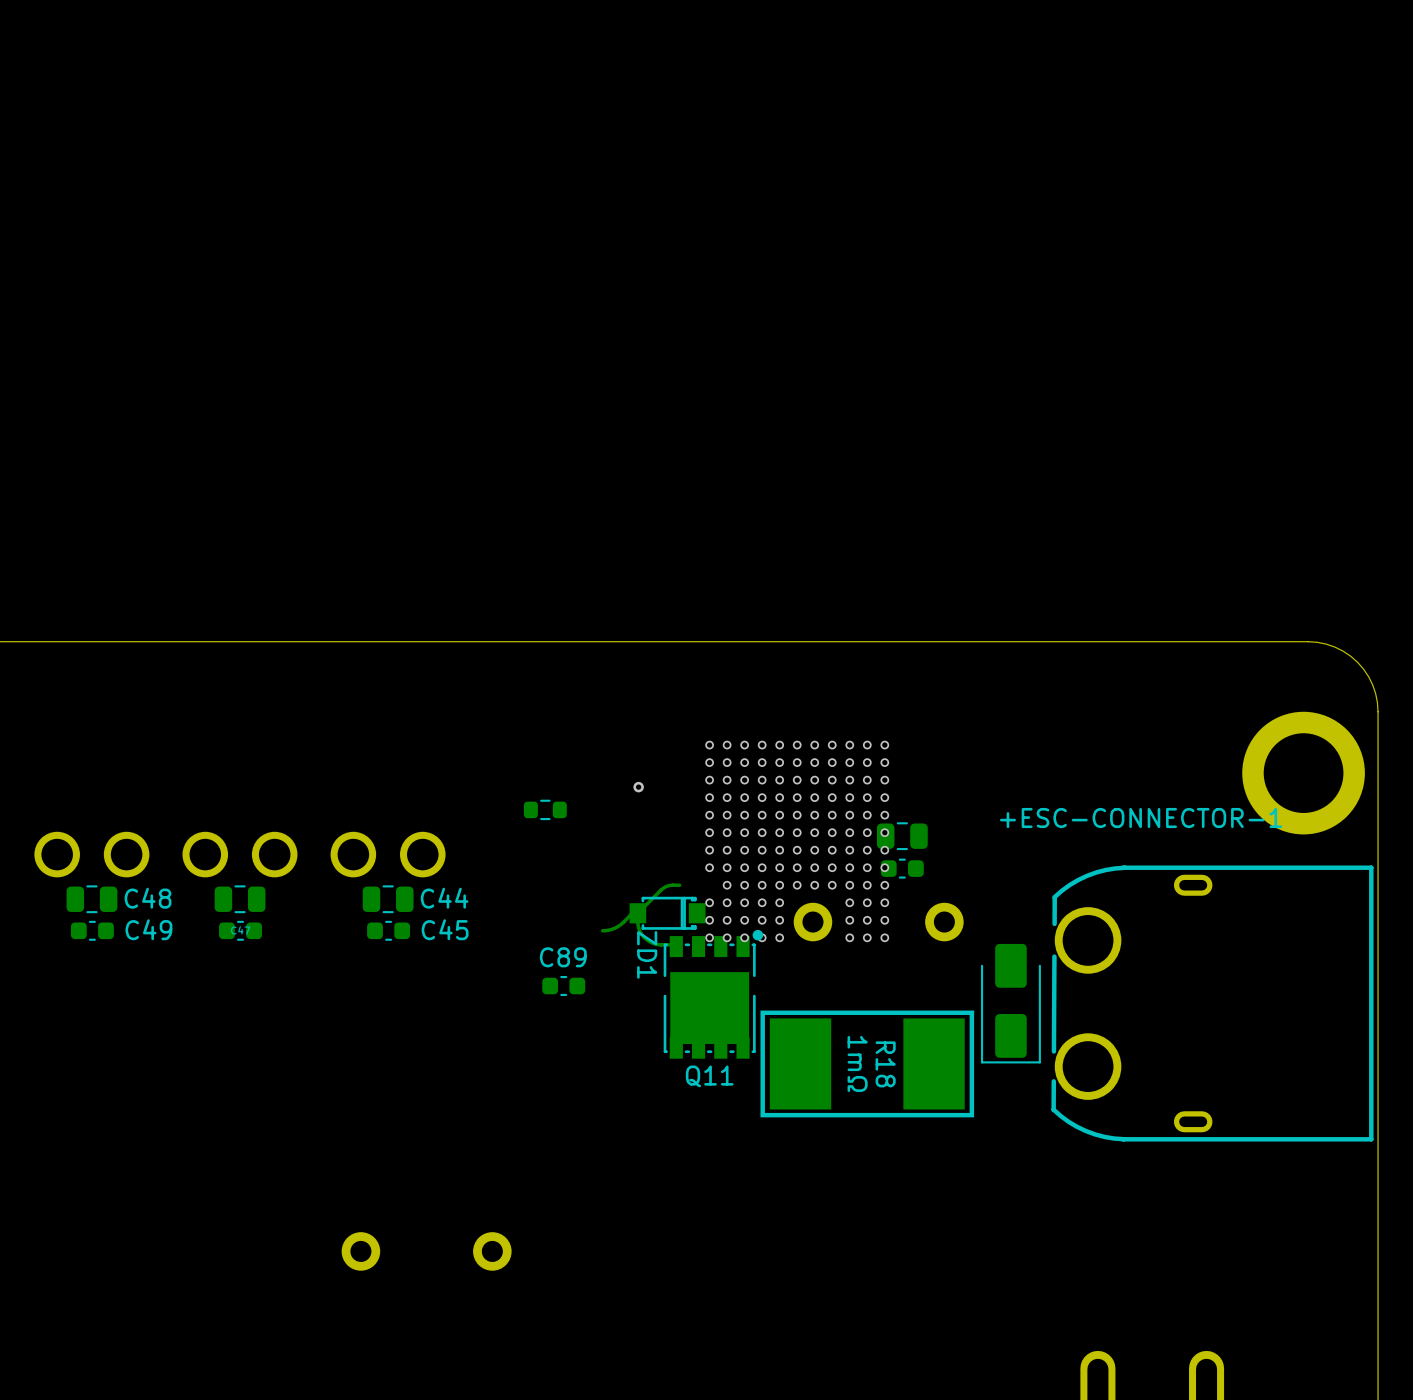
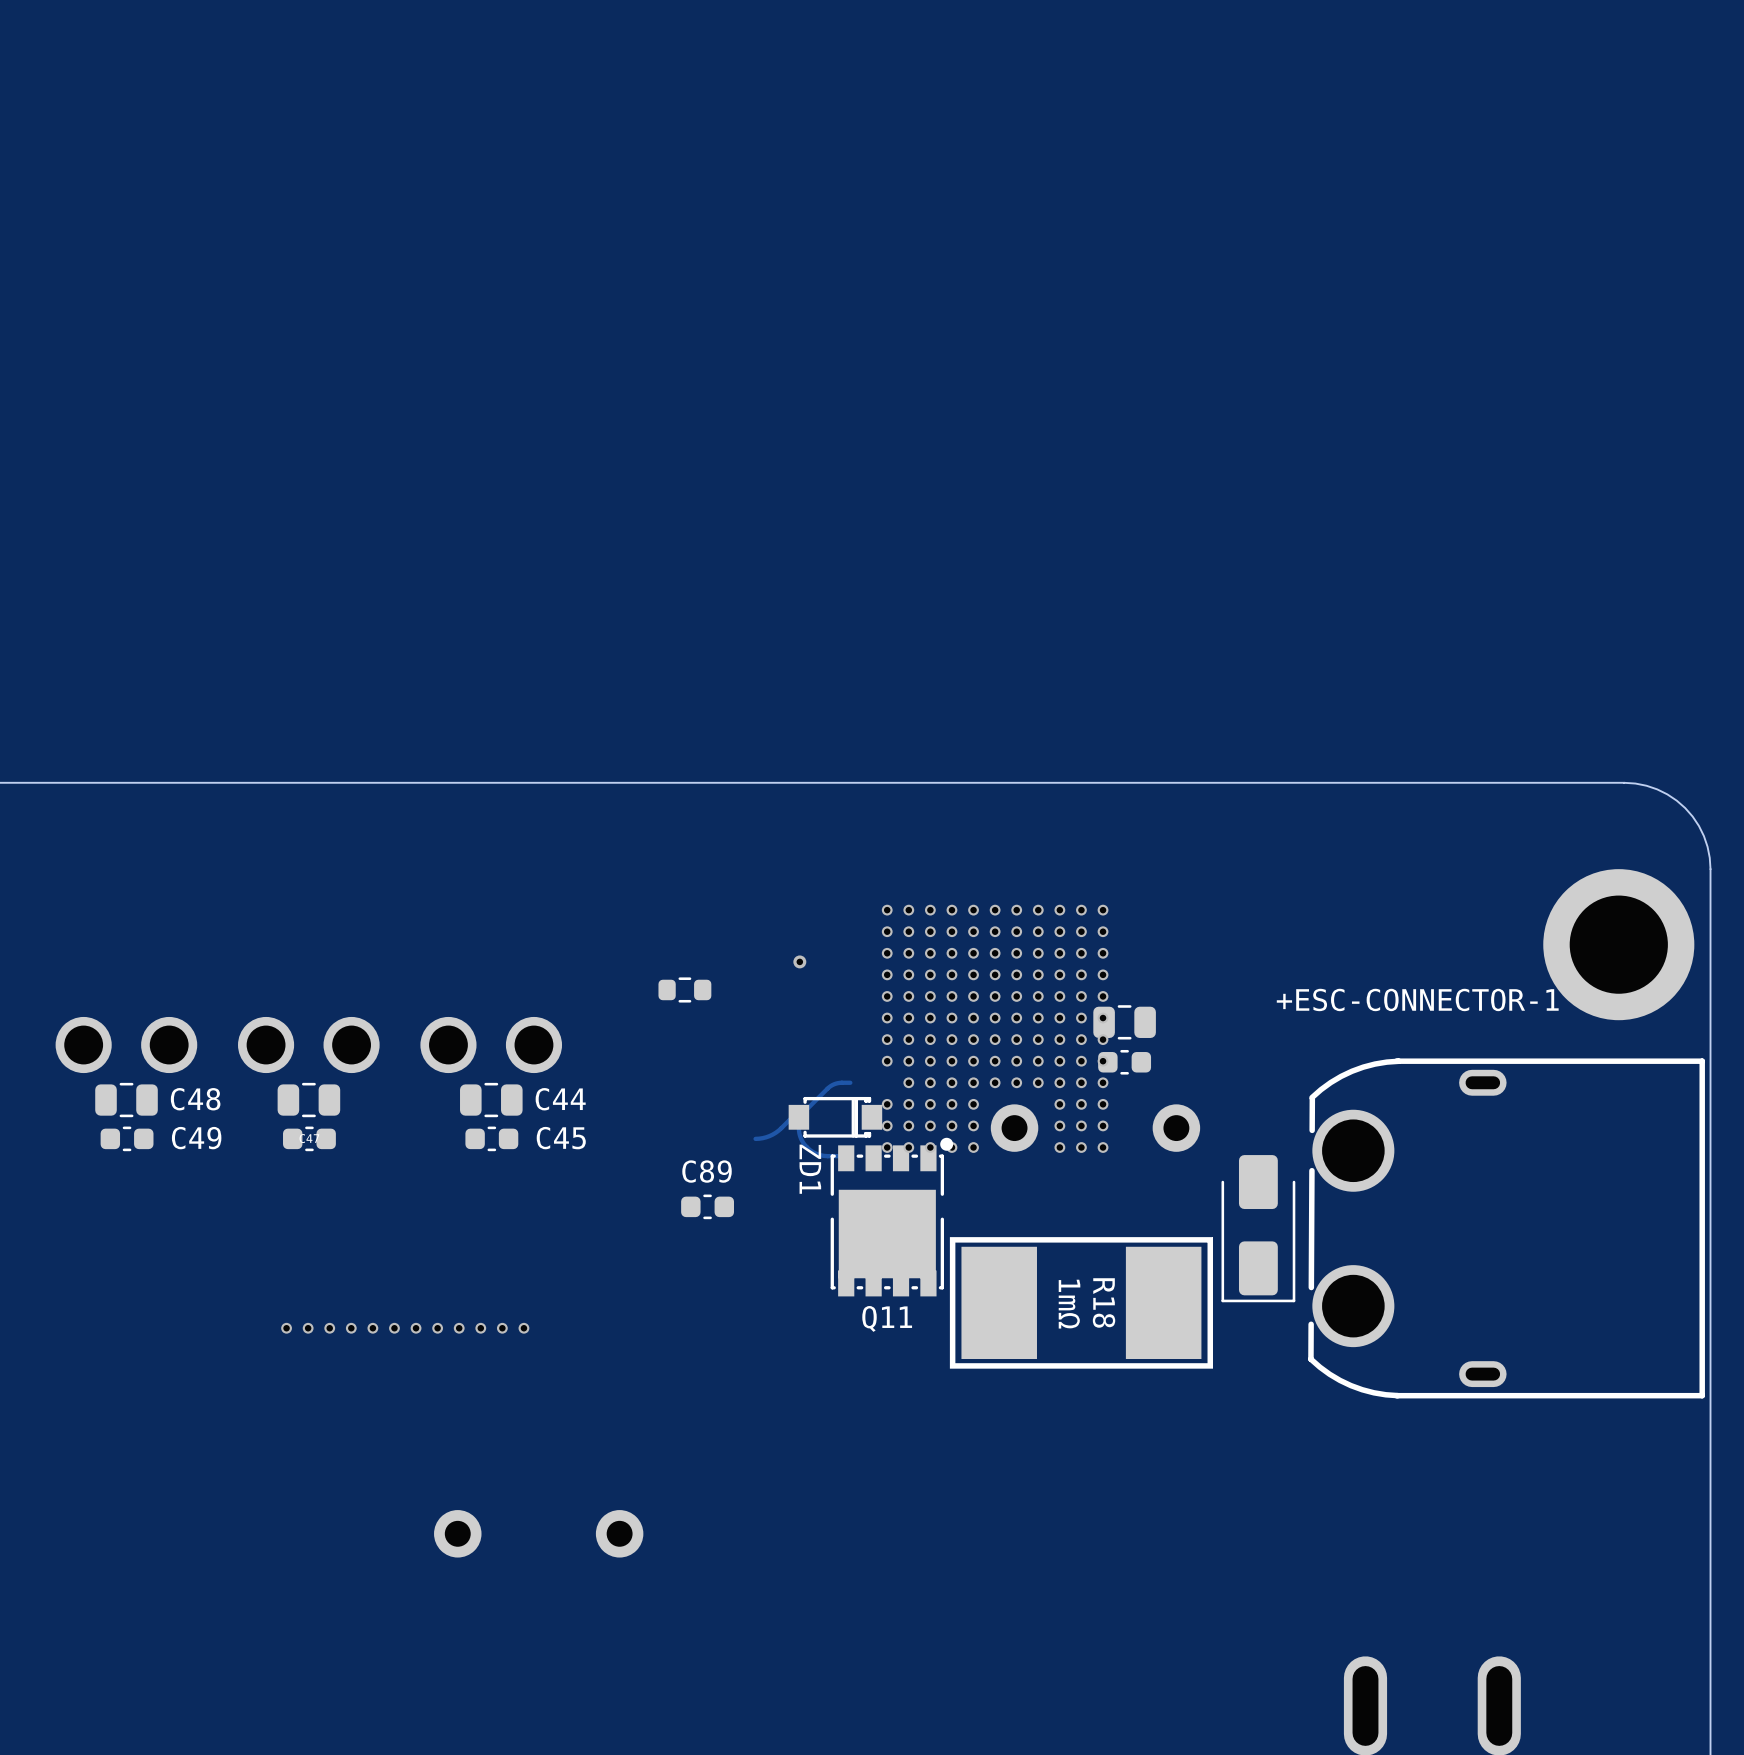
via: none -> (286, 1328)
via: none -> (308, 1328)
via: none -> (329, 1328)
via: none -> (351, 1328)
via: none -> (372, 1328)
via: none -> (394, 1328)
via: none -> (416, 1328)
via: none -> (437, 1328)
via: none -> (459, 1328)
via: none -> (480, 1328)
via: none -> (502, 1328)
via: none -> (523, 1328)

